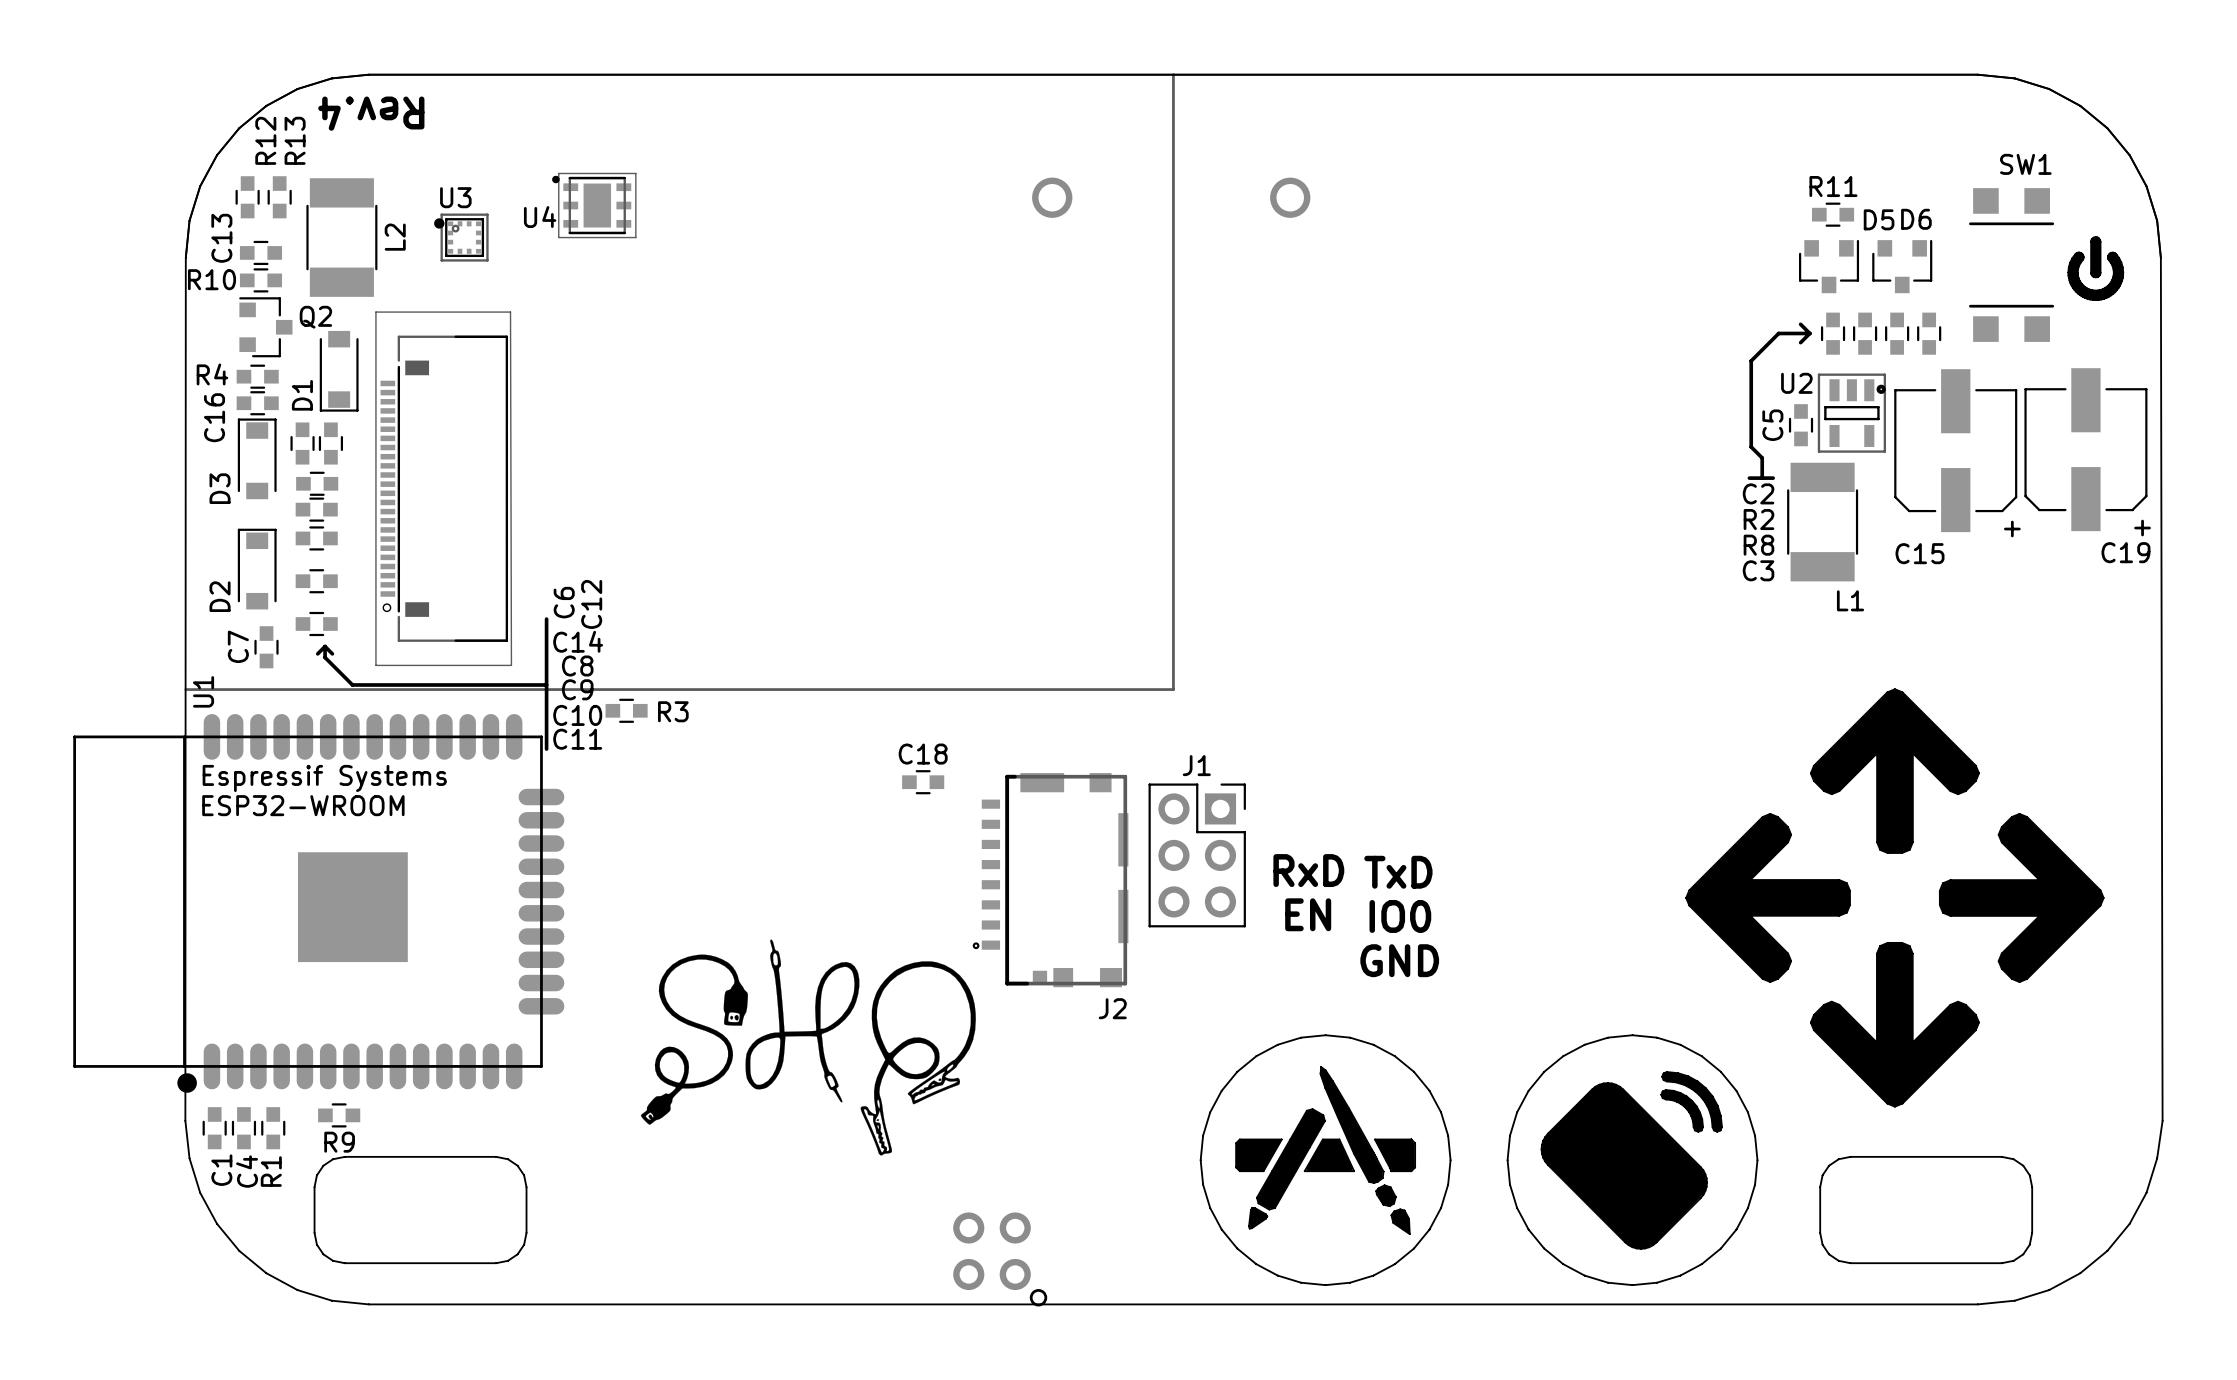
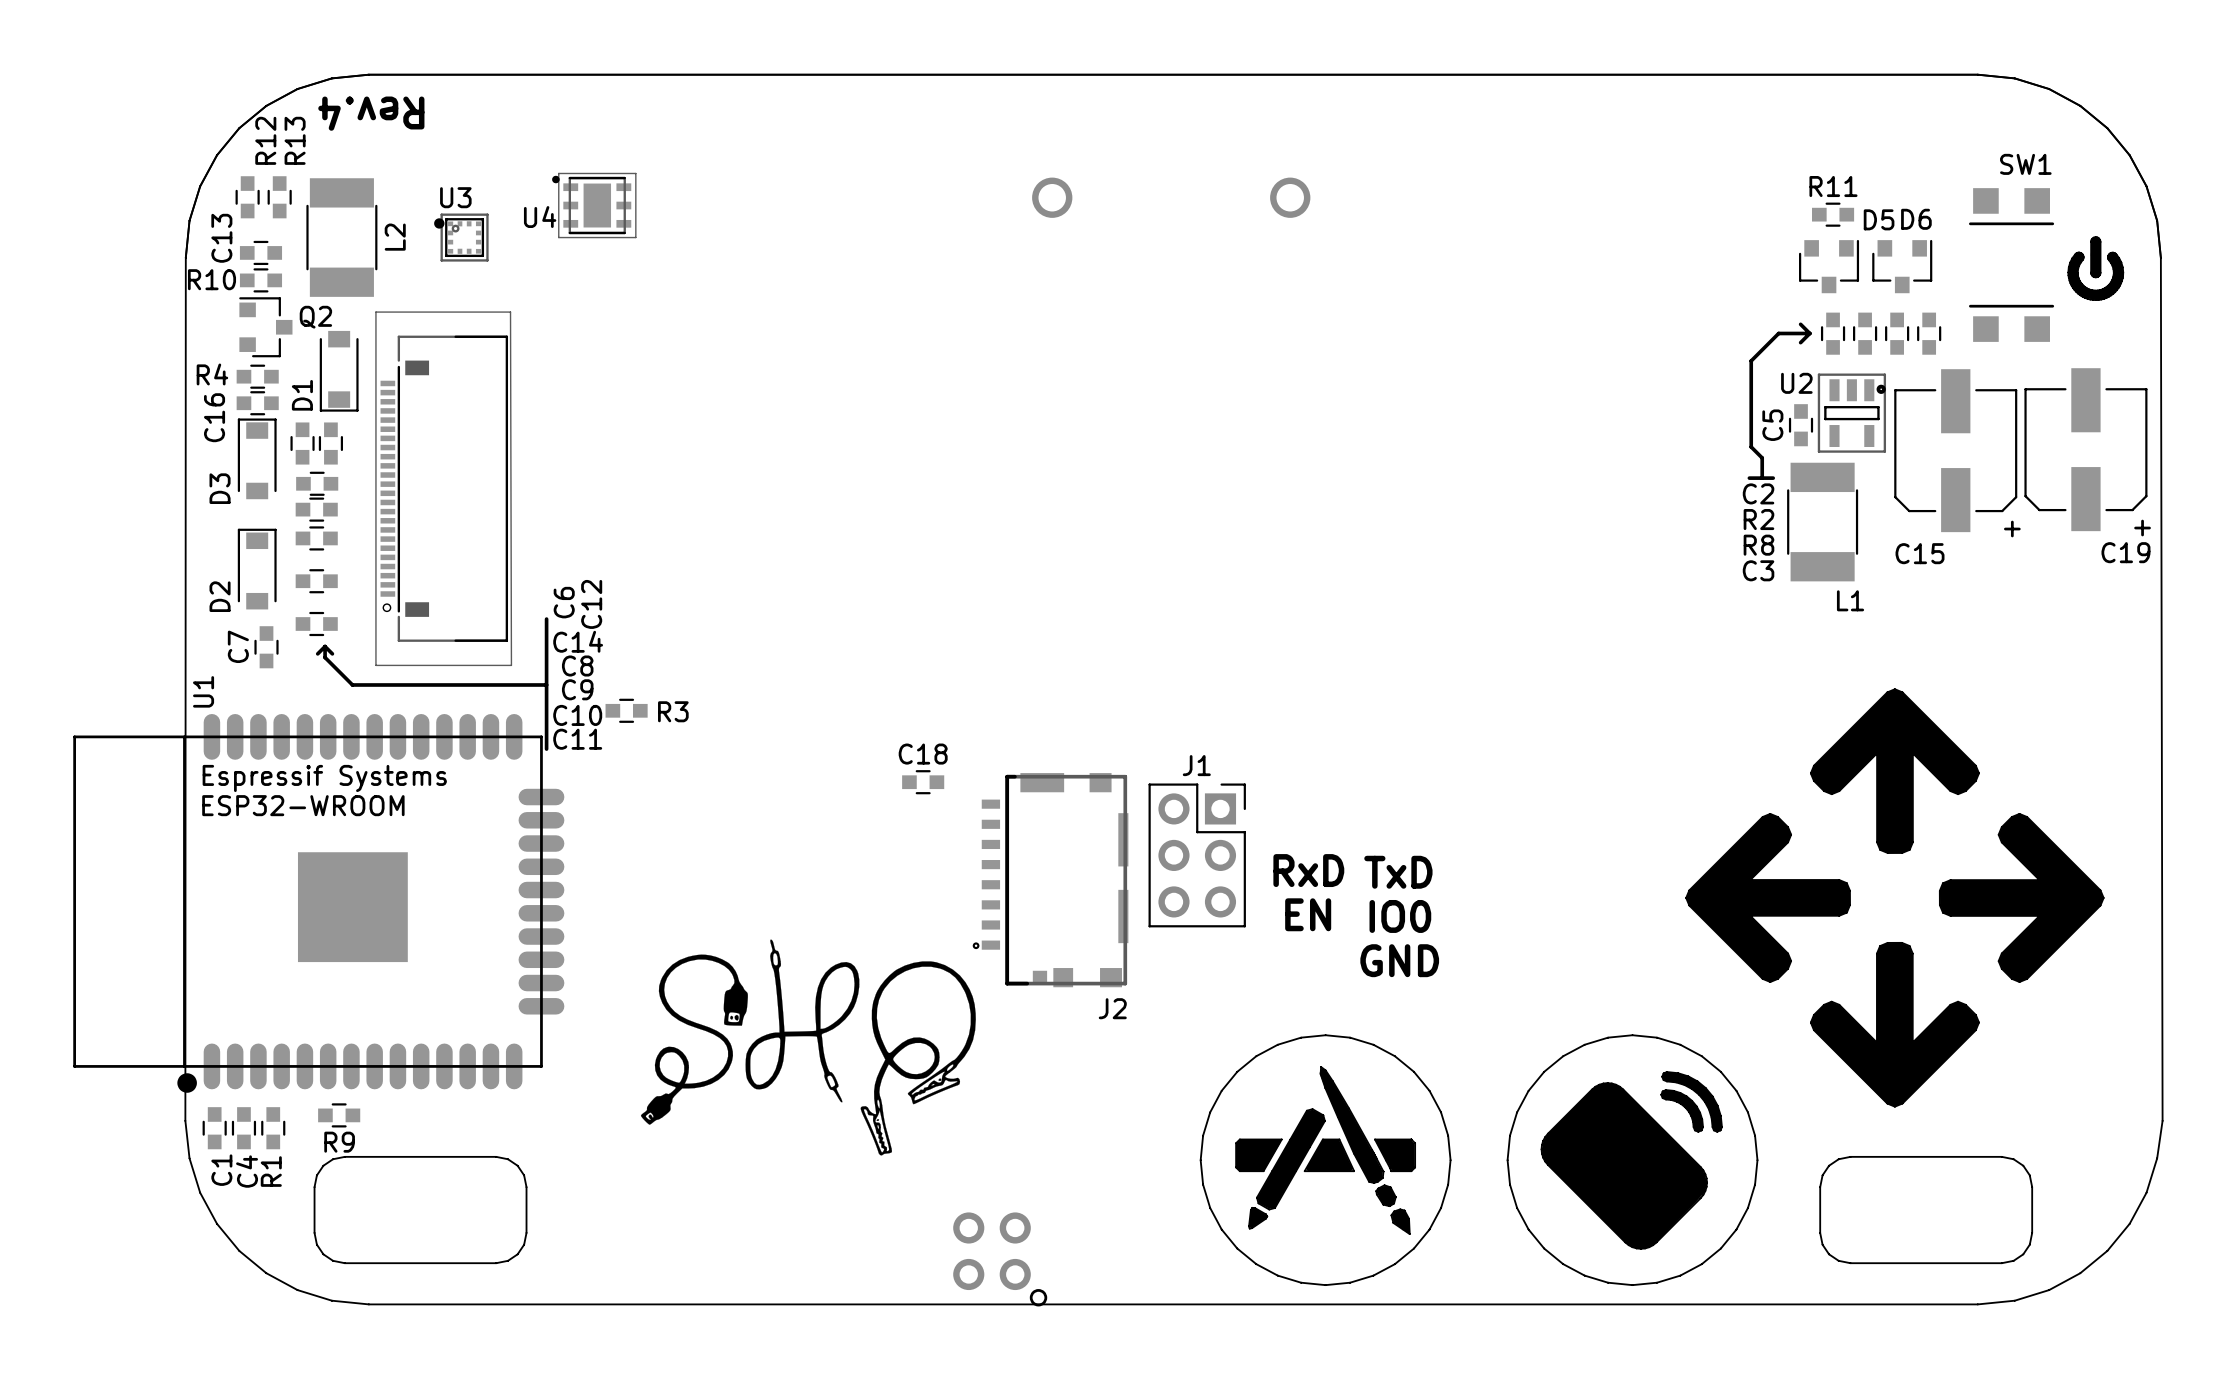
line: (1173, 74) (1173, 689) (185, 689) -> none

